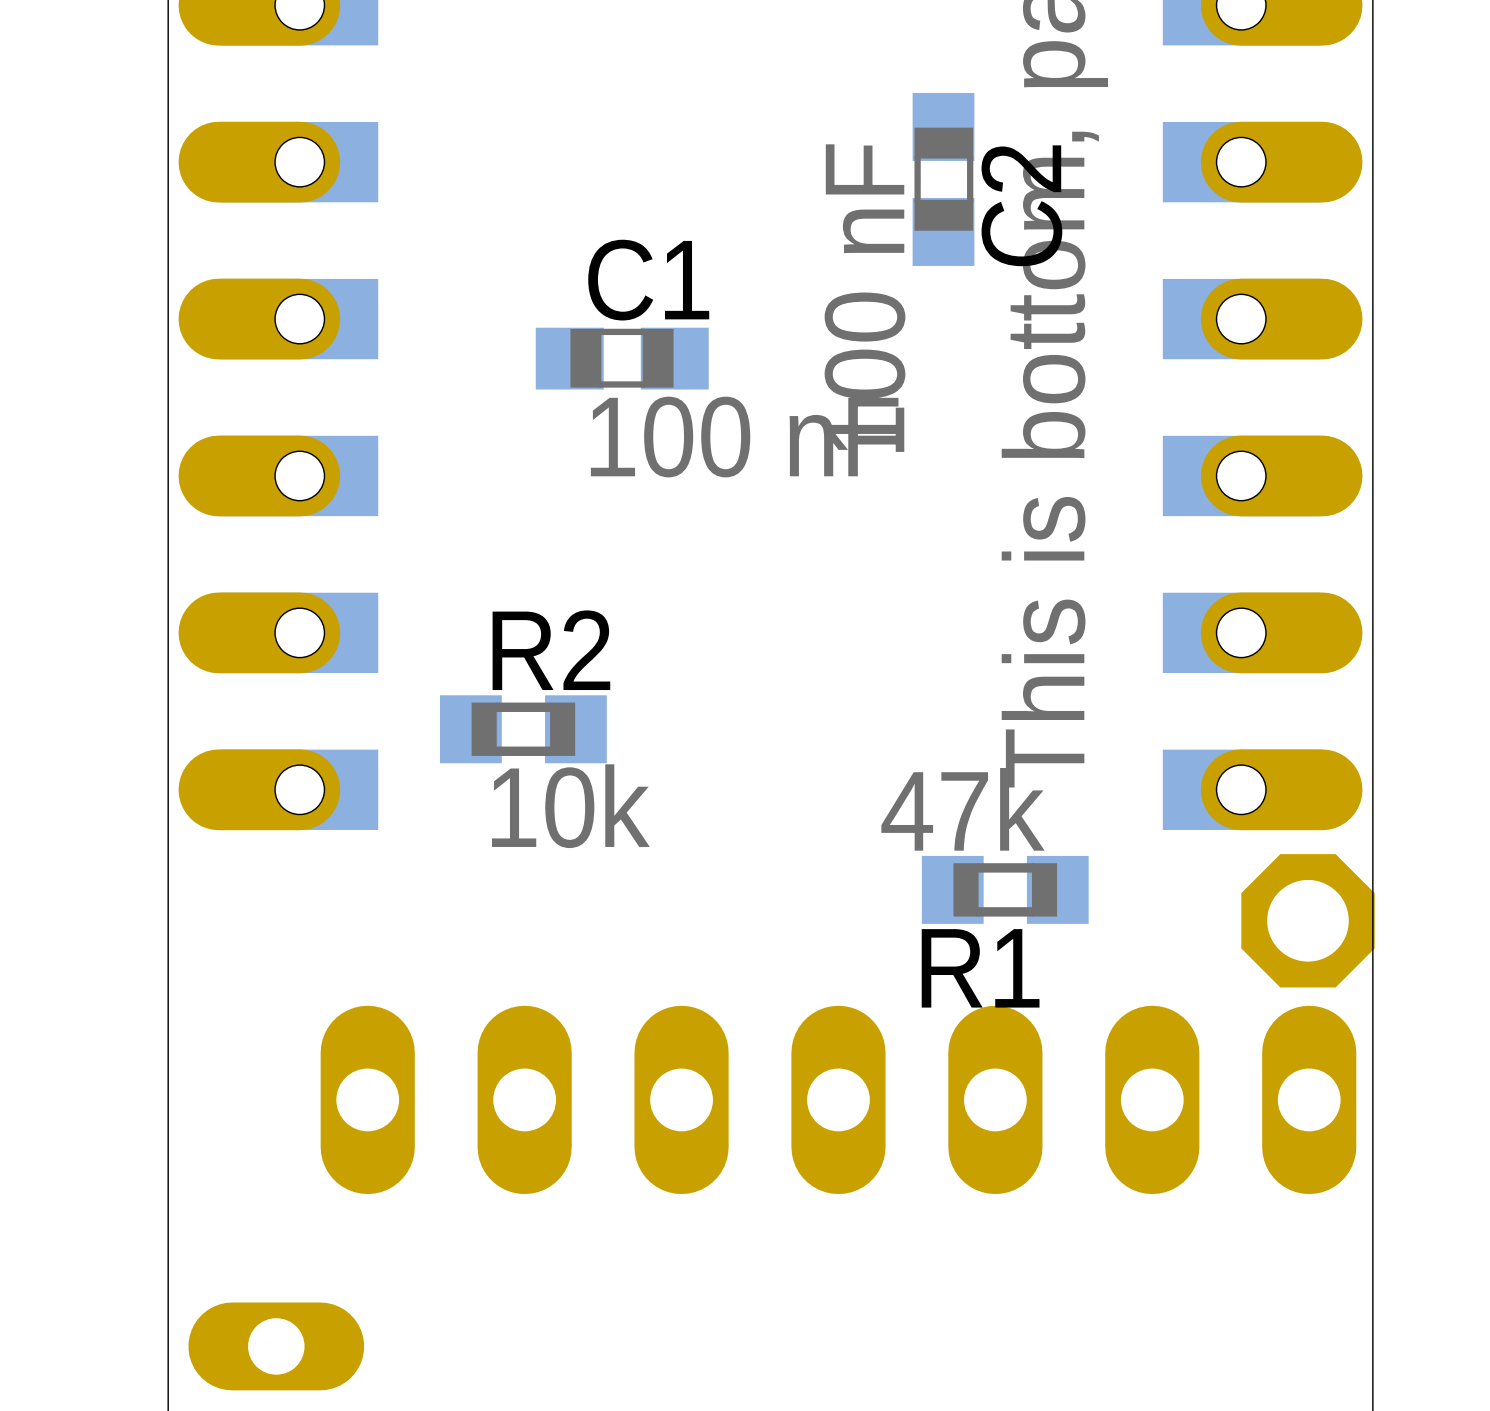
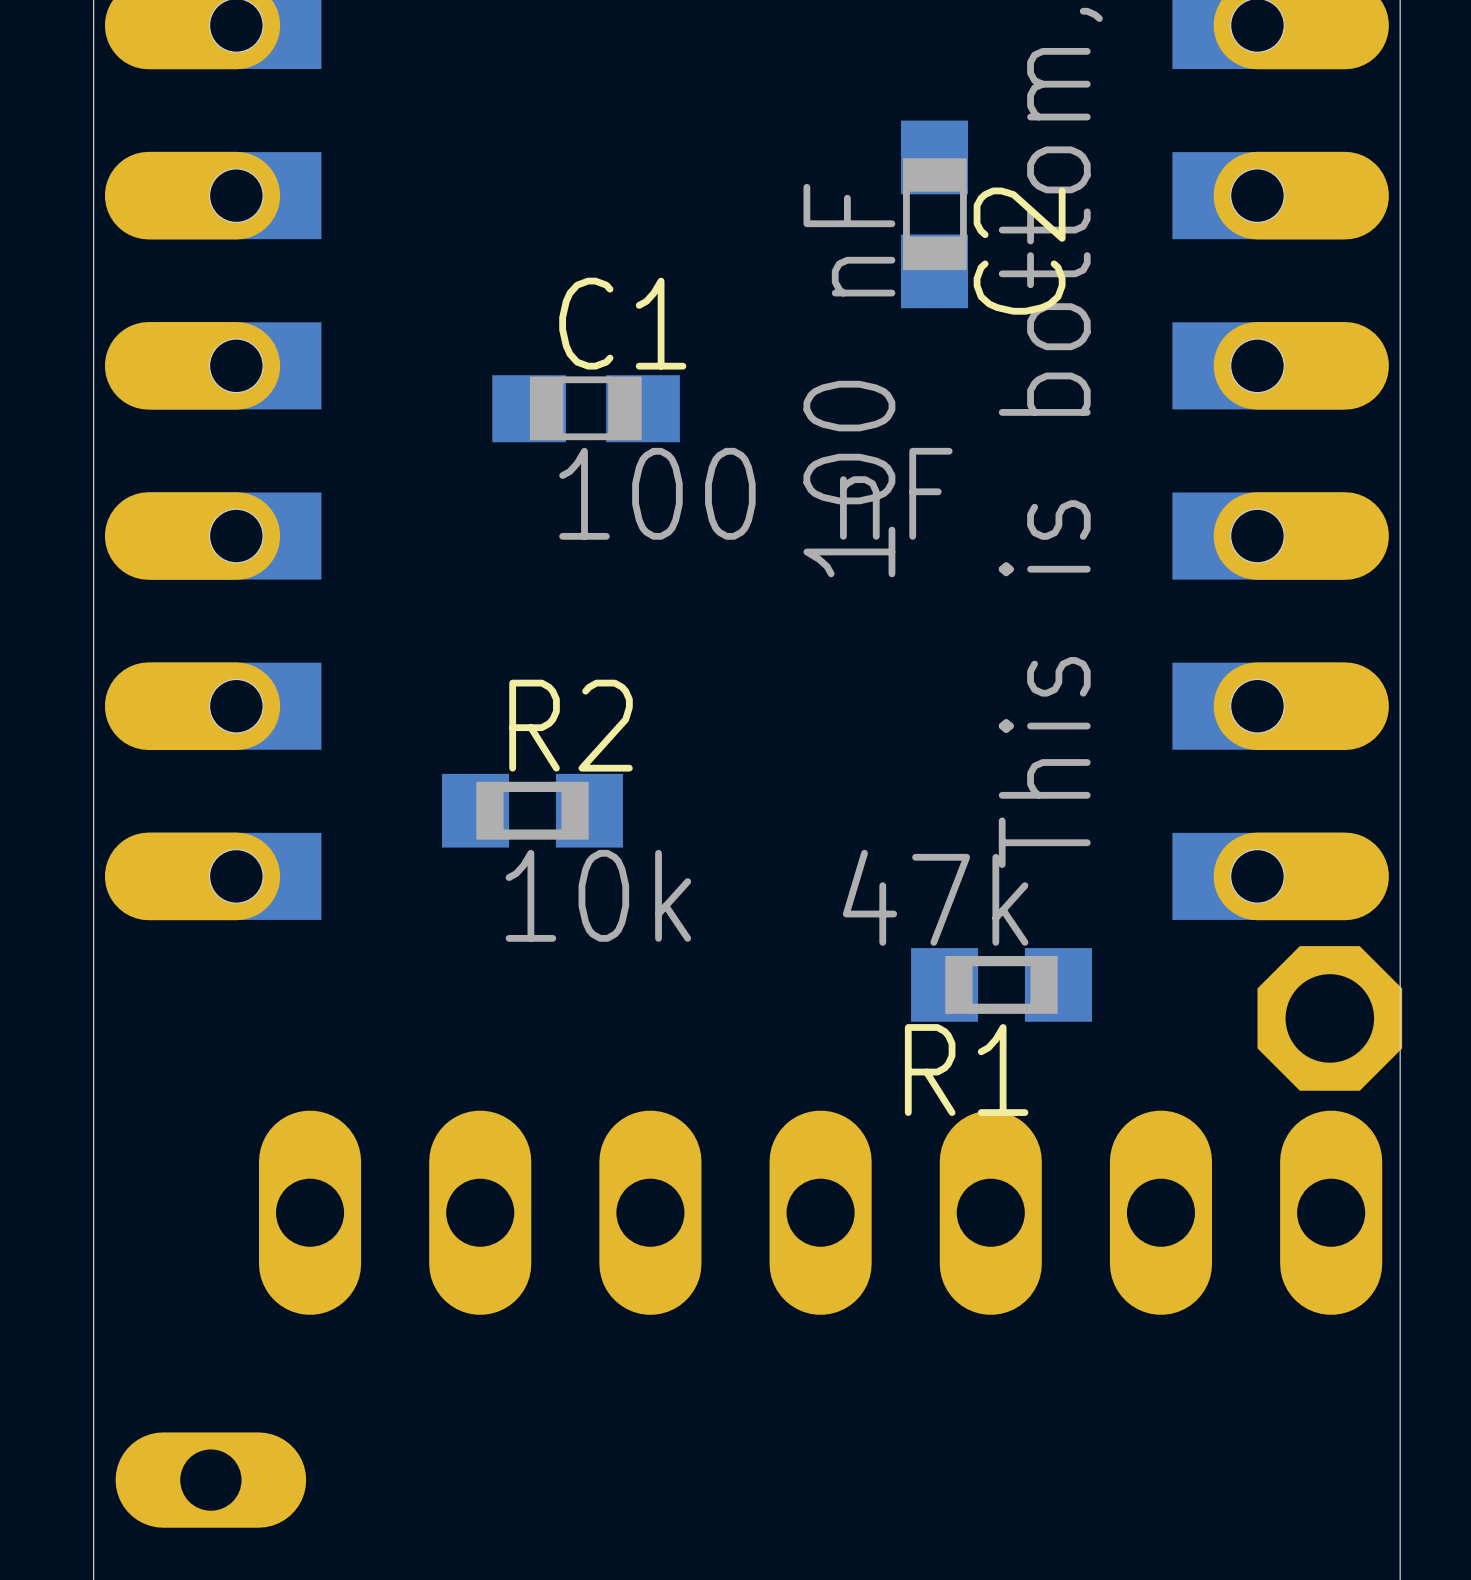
R2 position: (523, 729) -> (532, 810)

